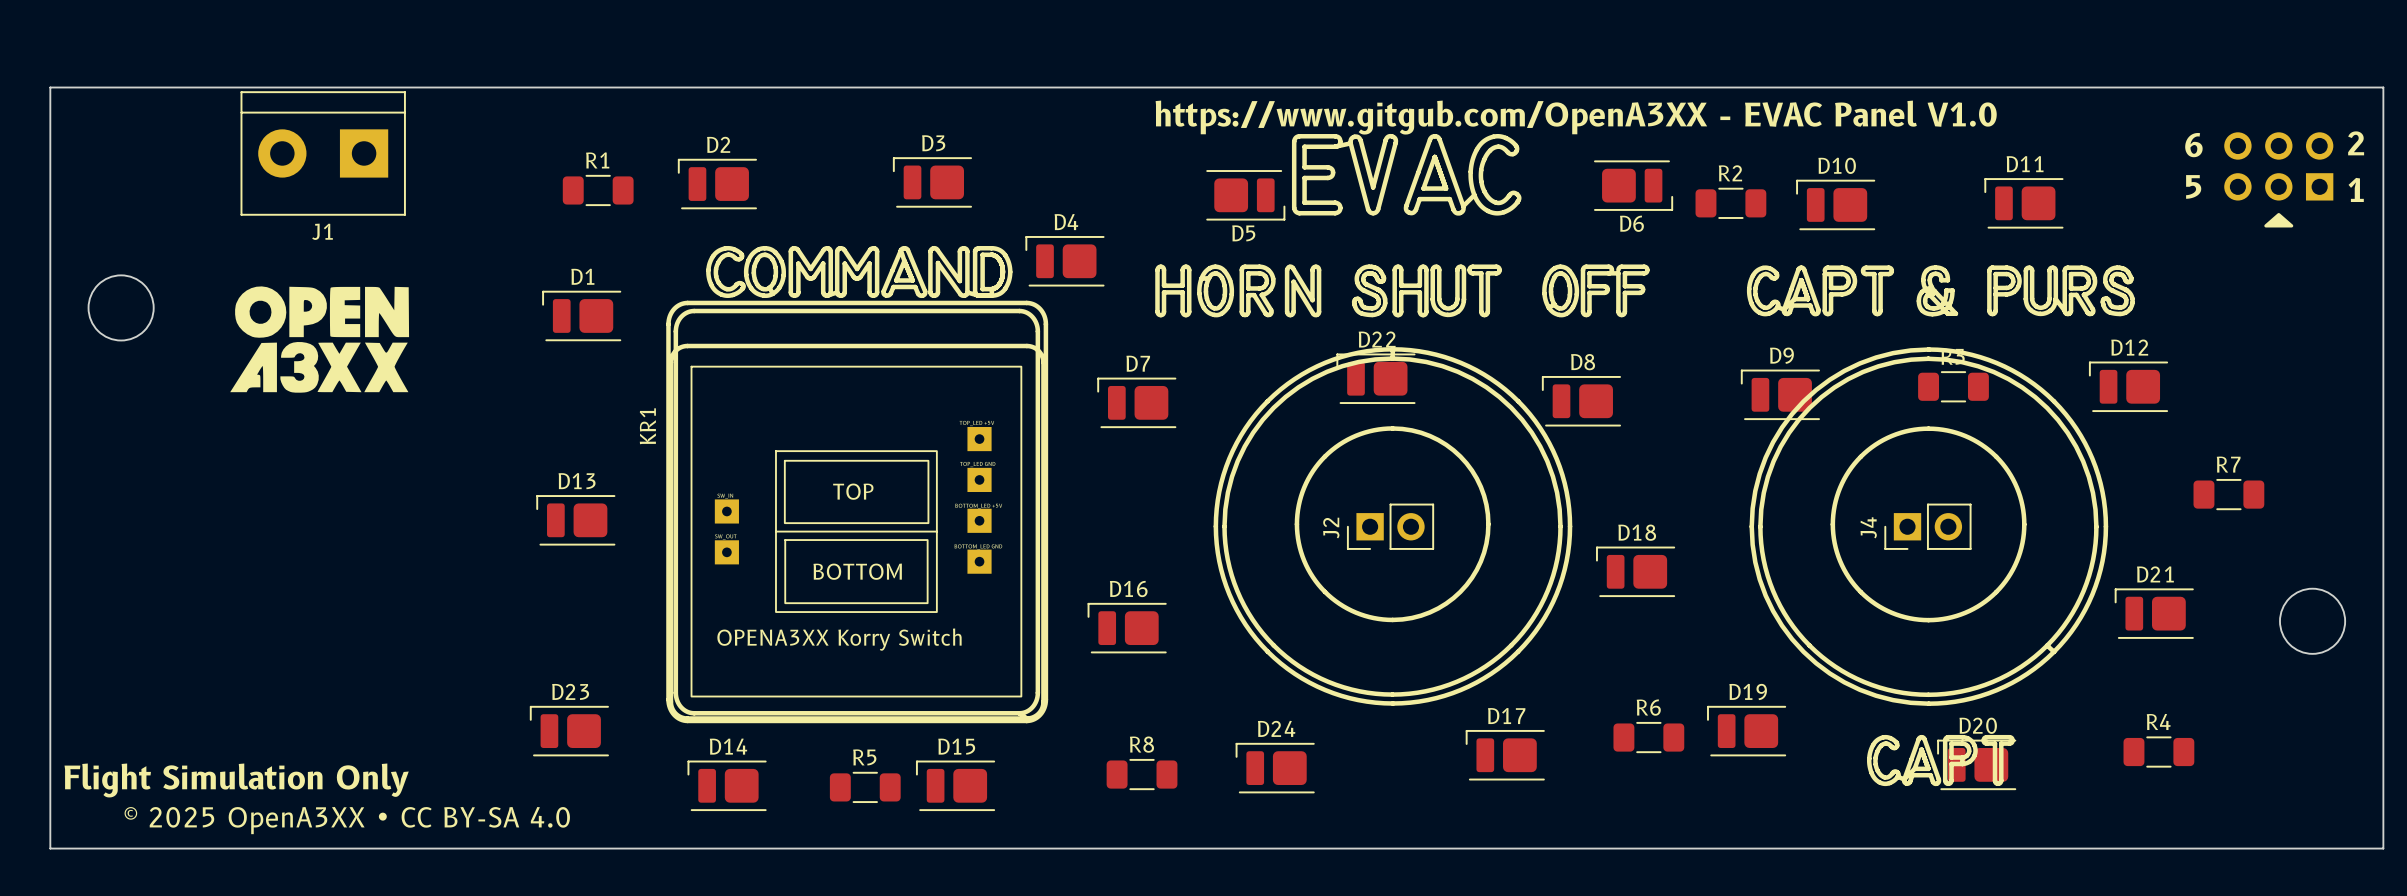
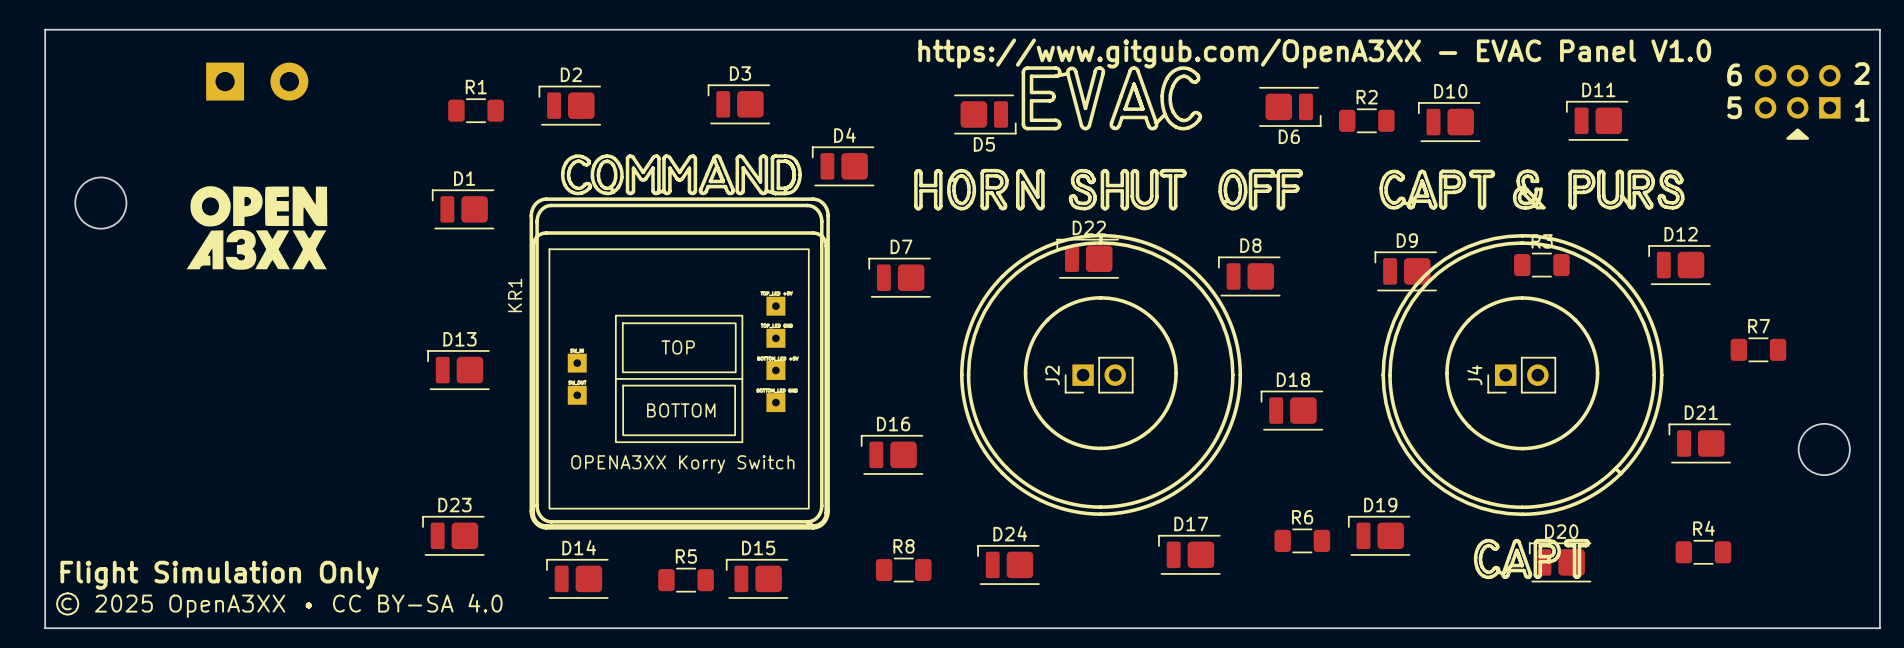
J1 side: top (323, 153) -> bottom (257, 81)

